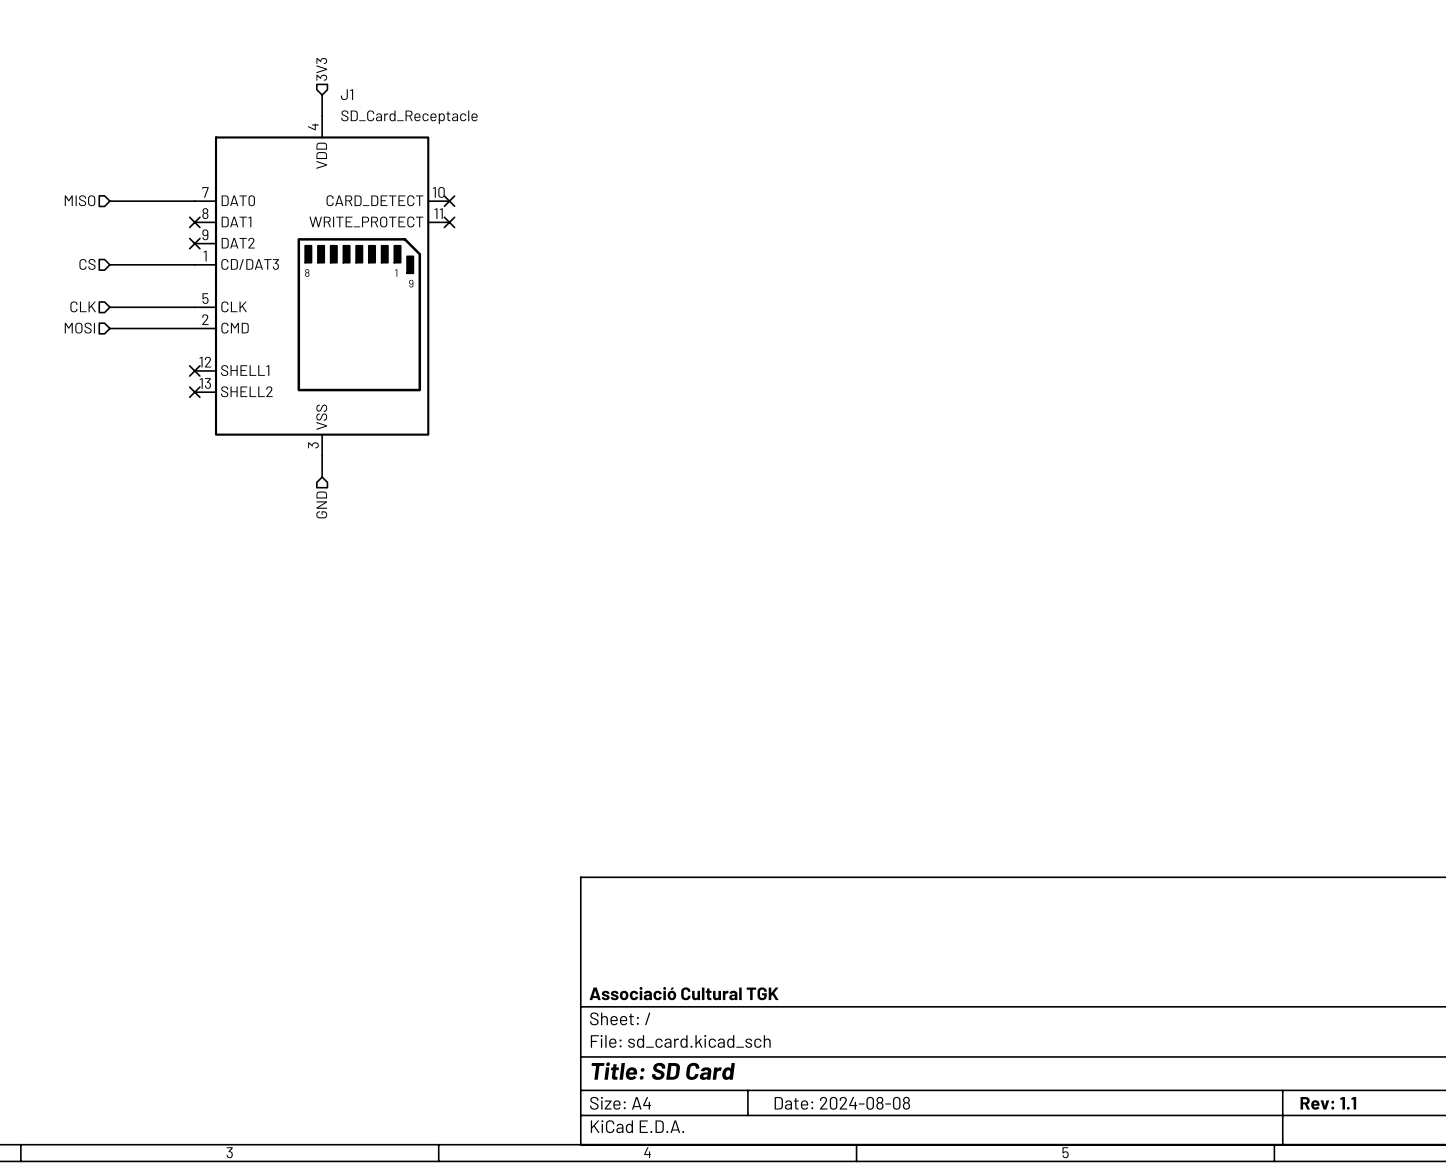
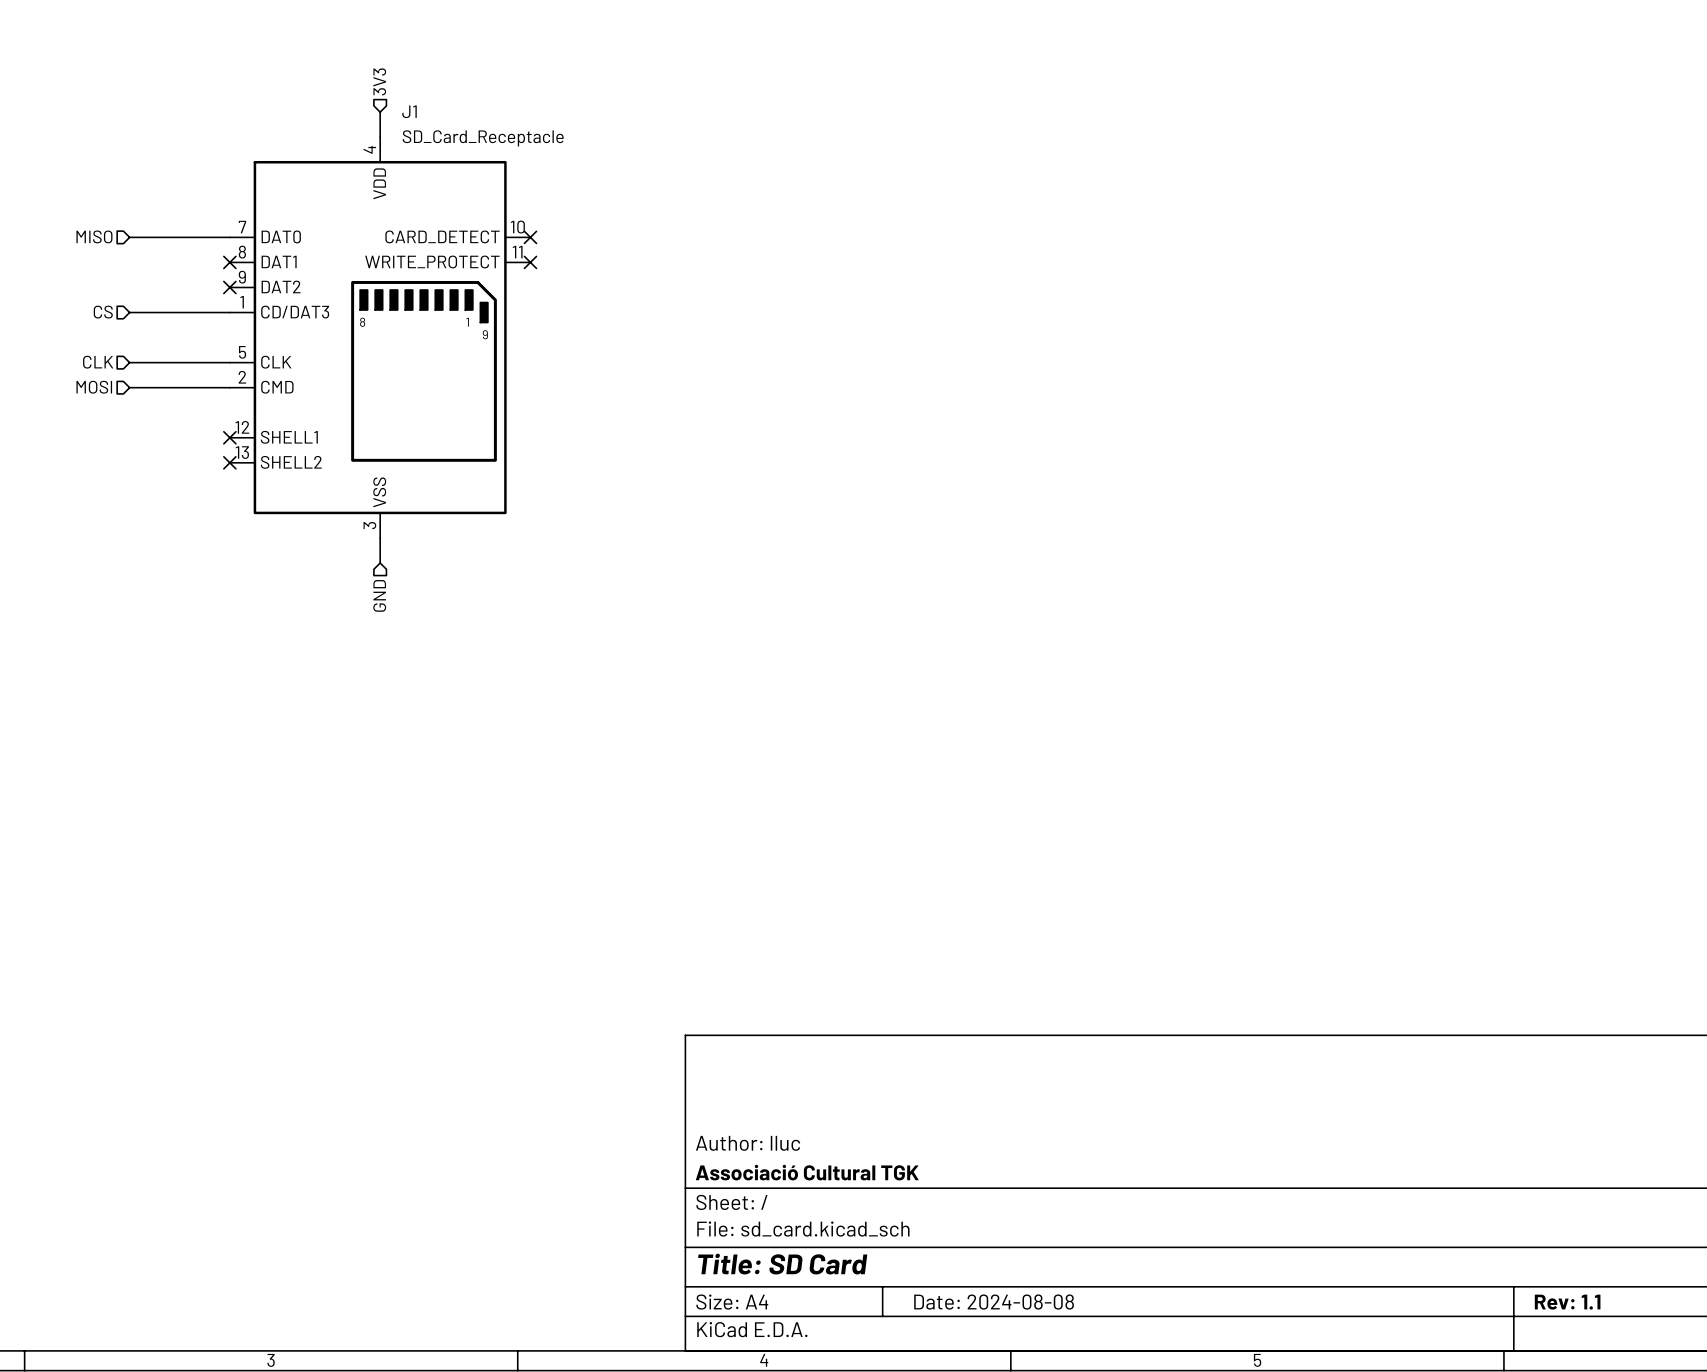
title block: none -> Author: lluc (748, 1143)

